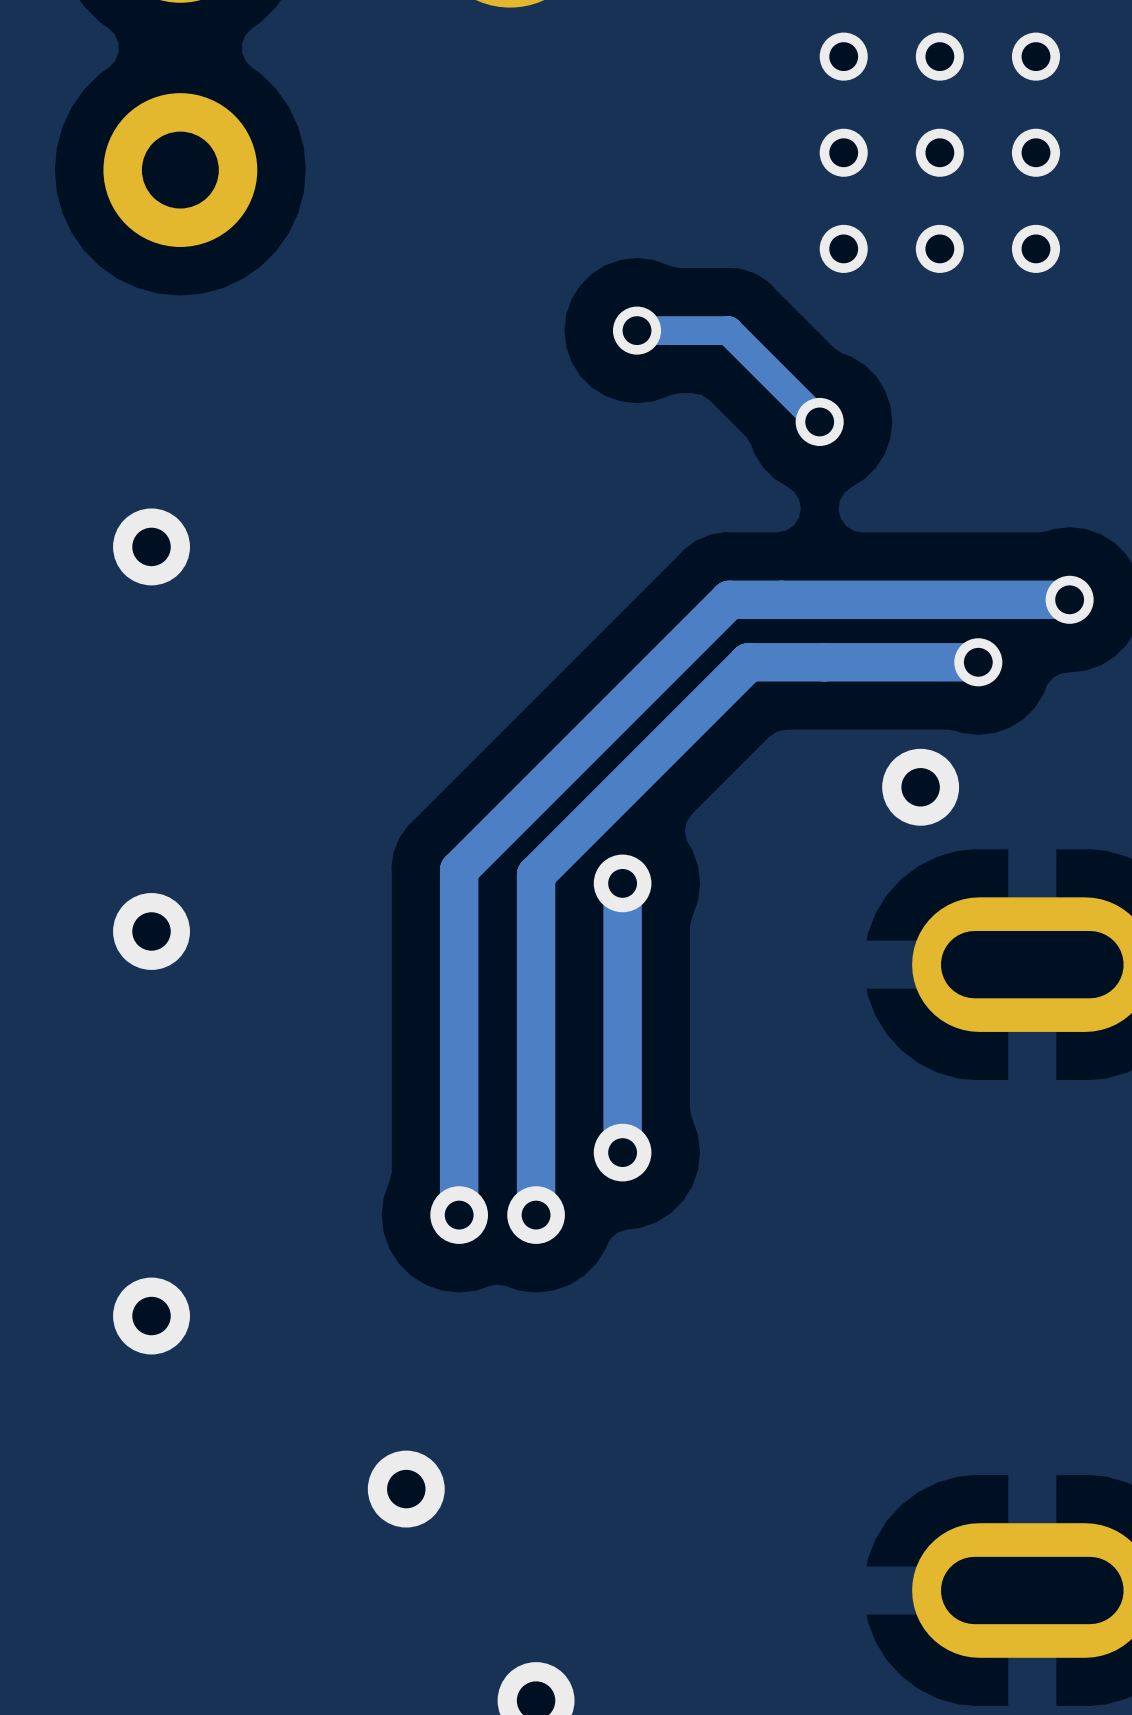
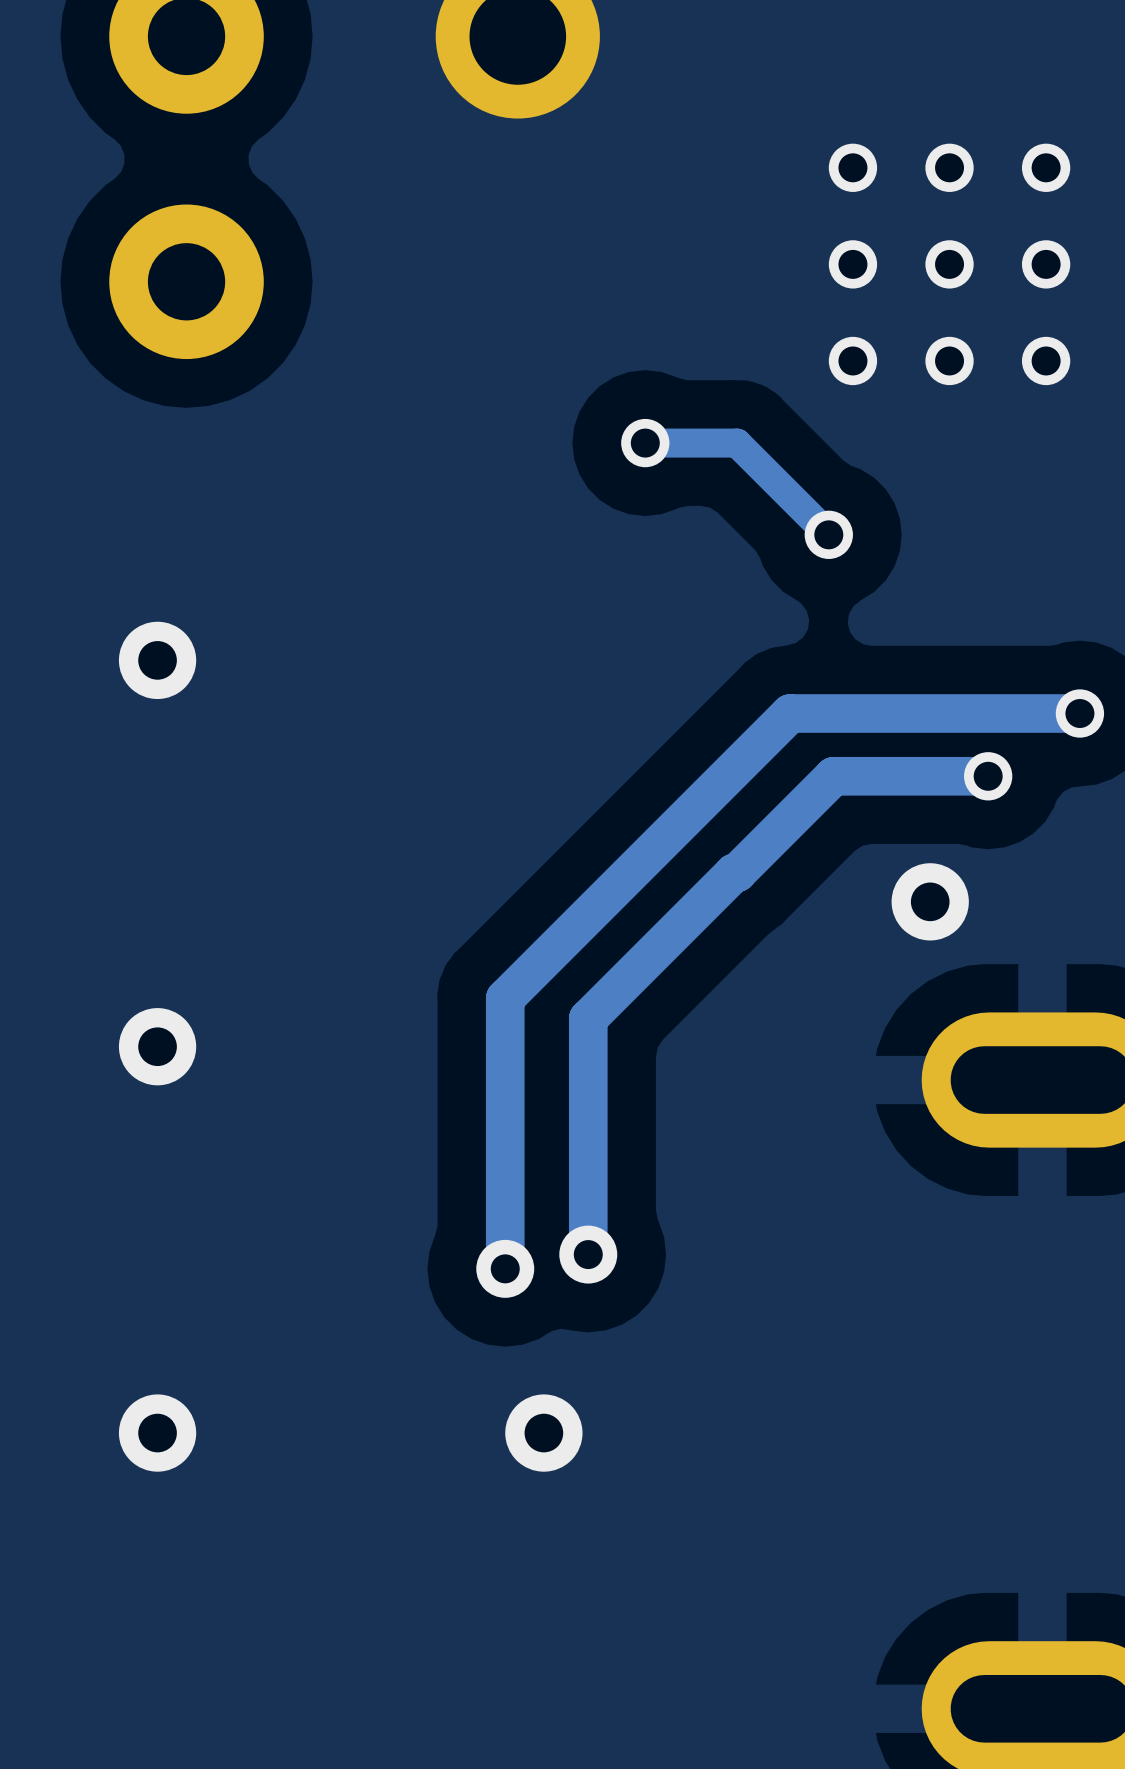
track: (781, 599) (729, 599) (459, 870) (459, 1215) -> (790, 713) (505, 998) (505, 1268)
track: (824, 662) (748, 662) (536, 874) (536, 1215) -> (833, 776) (588, 1018) (588, 1254)
track: (622, 883) (622, 1152) -> none
via: (622, 883) -> none
via: none -> (505, 1268)
via position: (622, 1152) -> (588, 1254)
via: (459, 1215) -> none
via: (536, 1215) -> none
via position: (406, 1489) -> (543, 1433)

